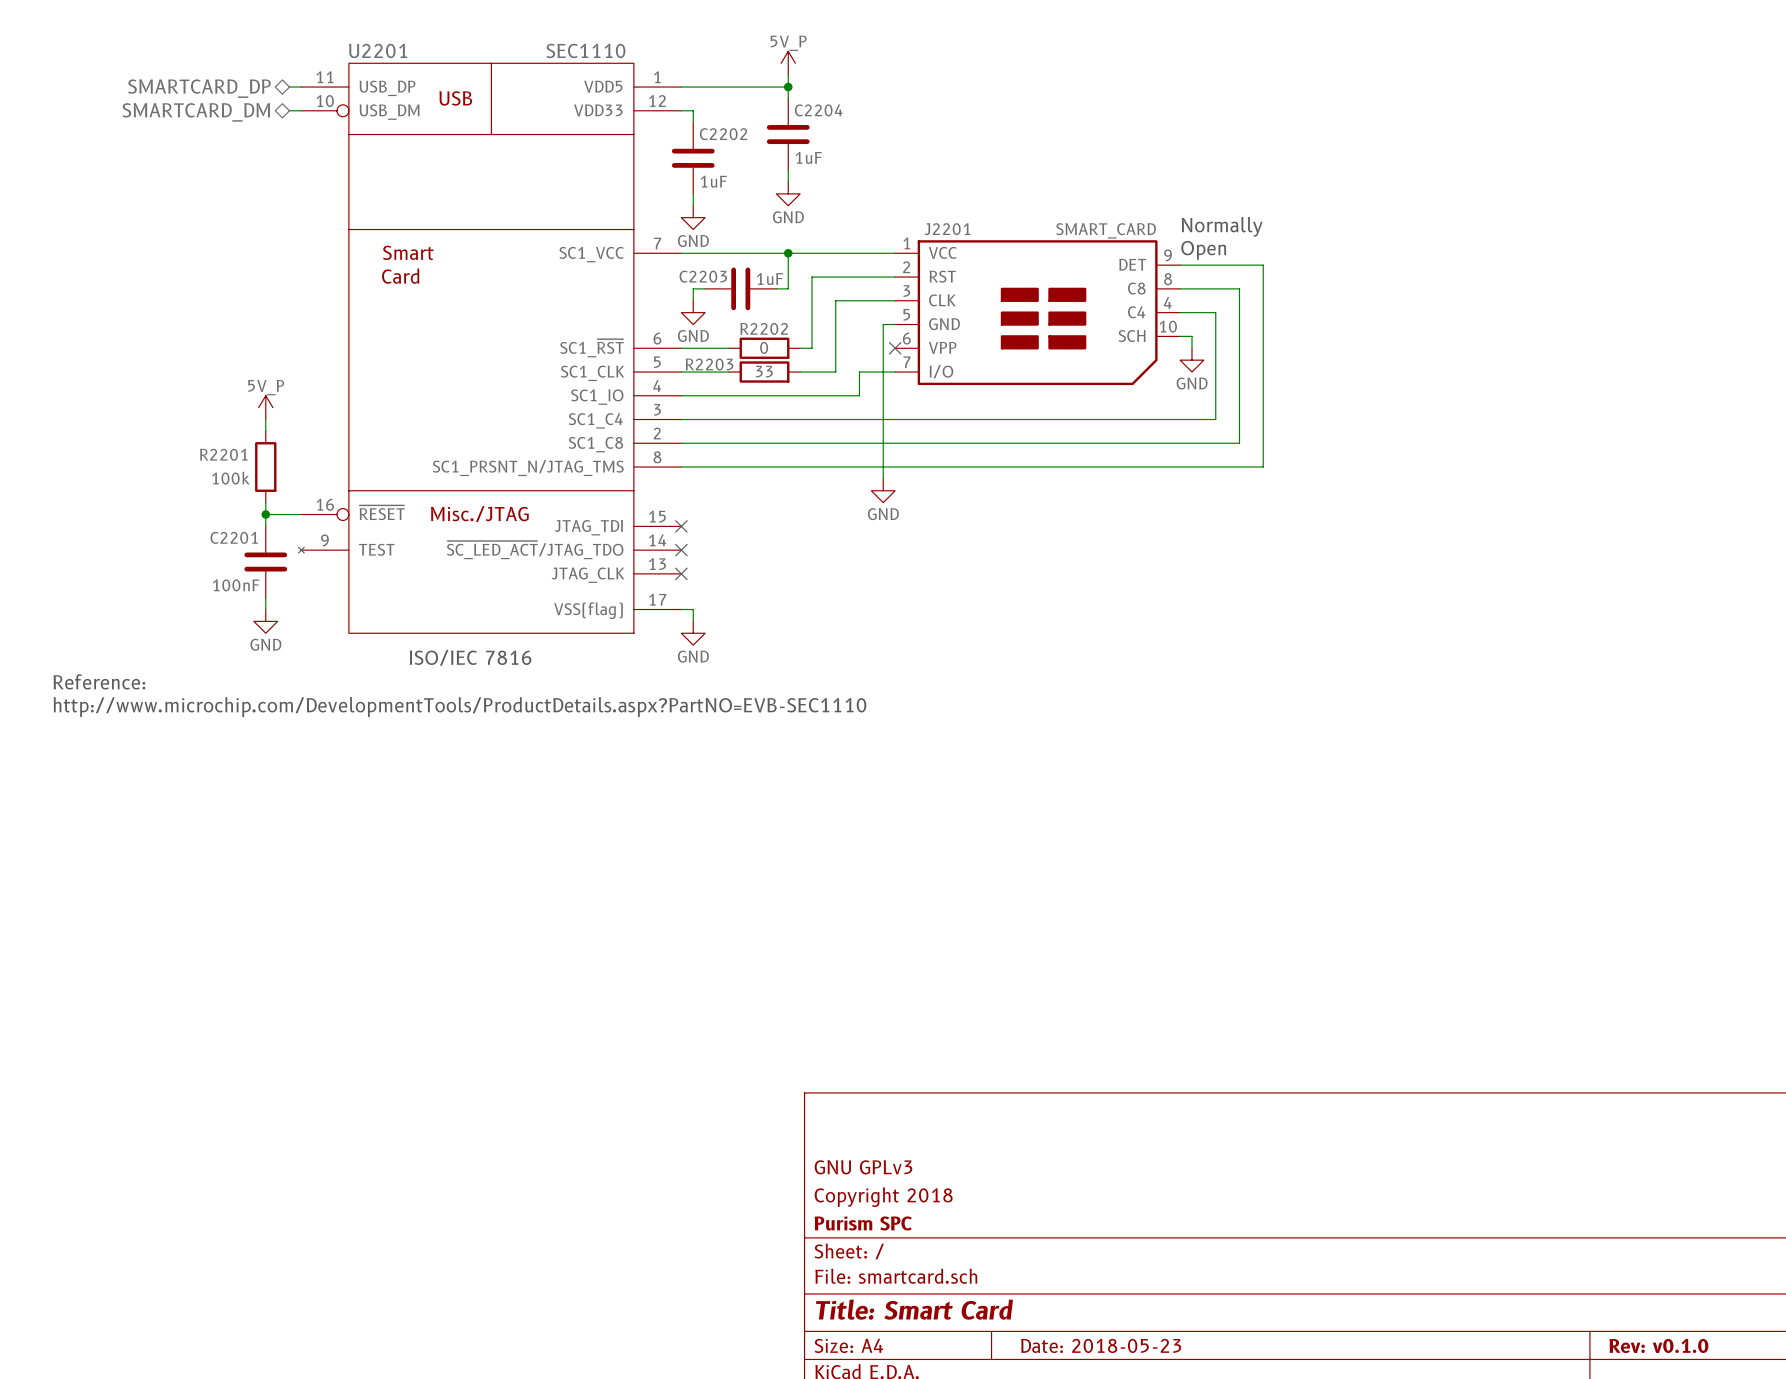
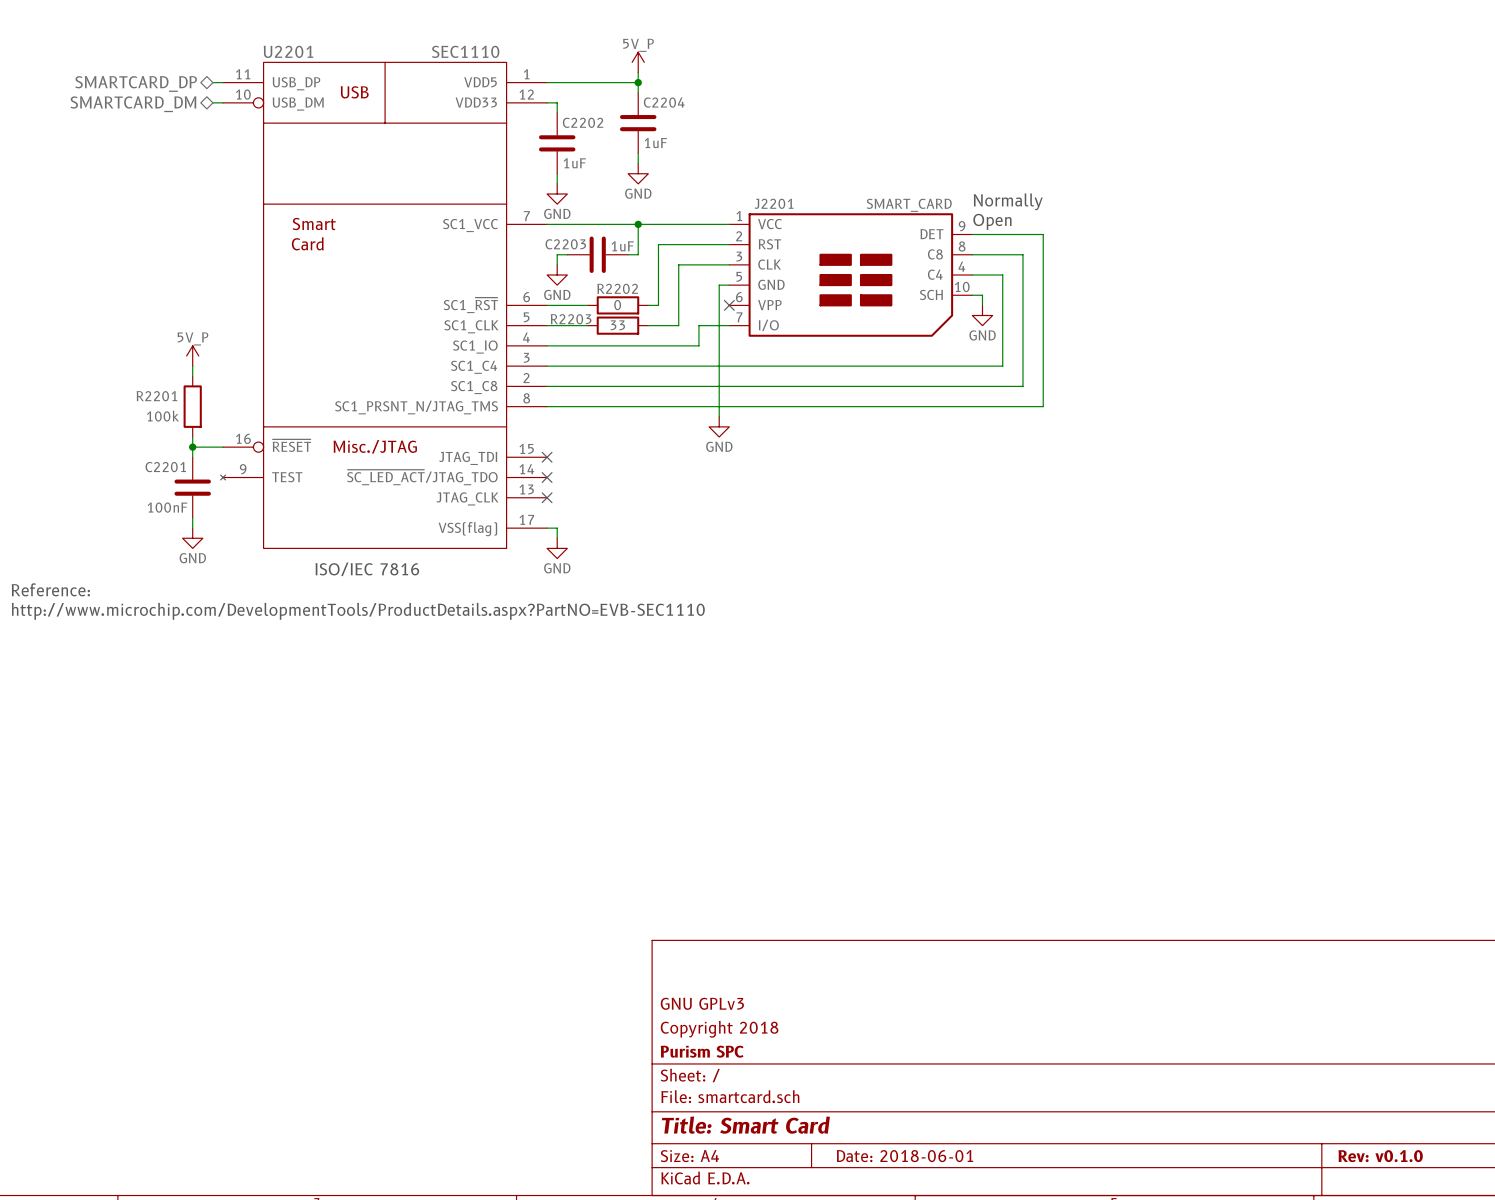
title block: Date: 2018-05-23 (1101, 1345) -> Date: 2018-06-01 (905, 1156)

